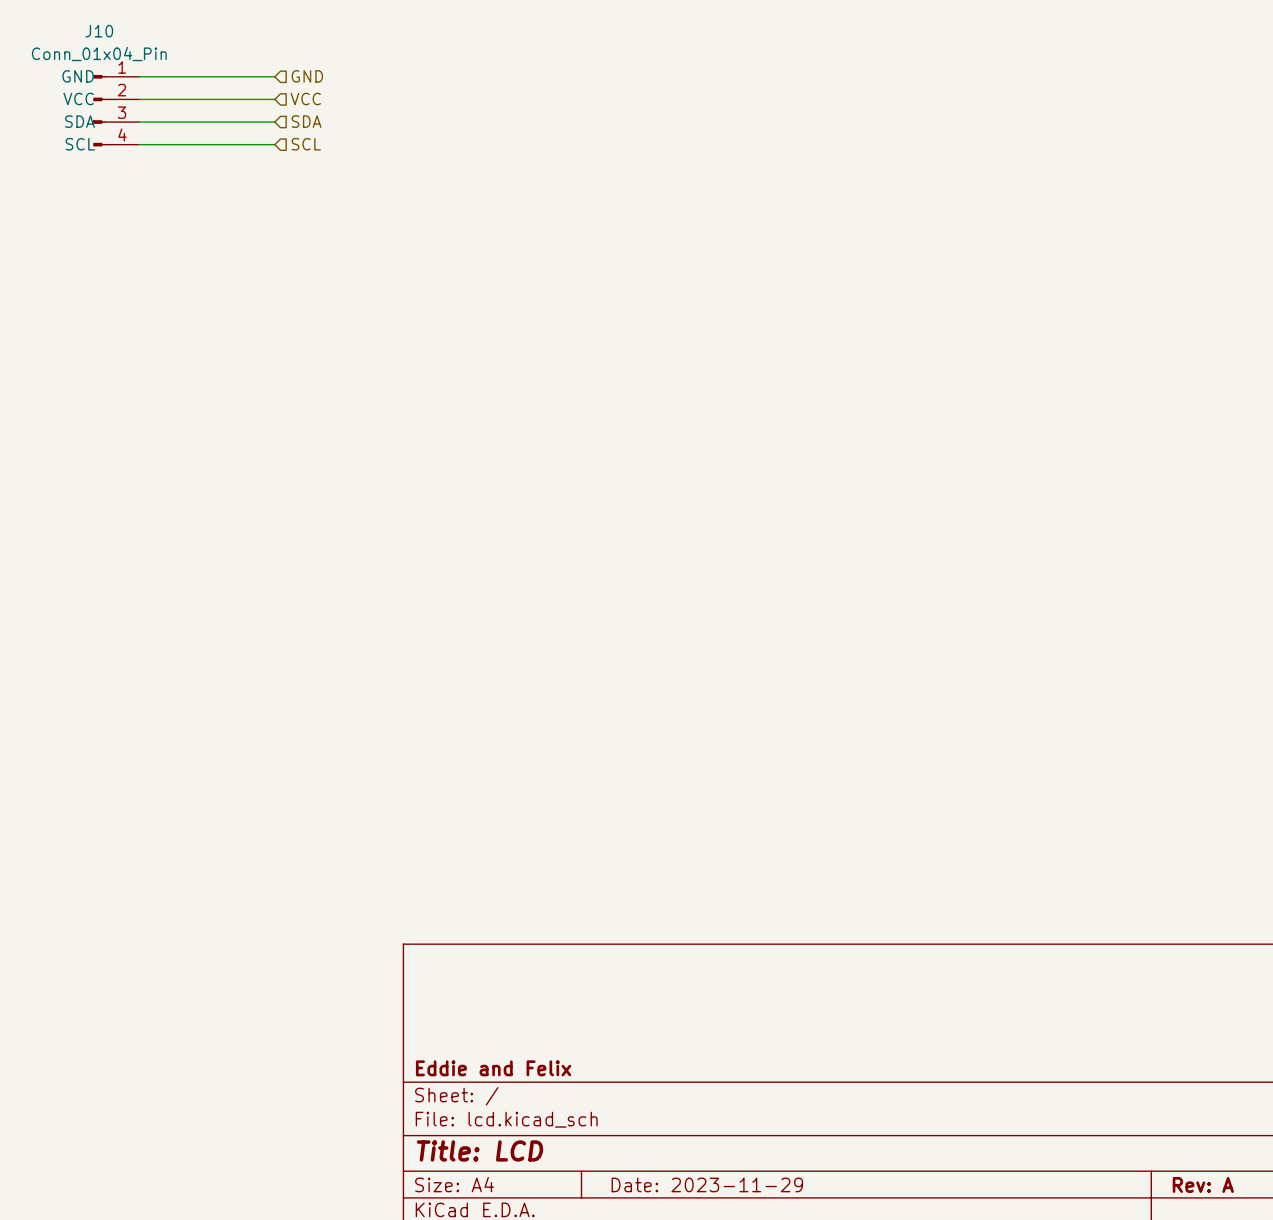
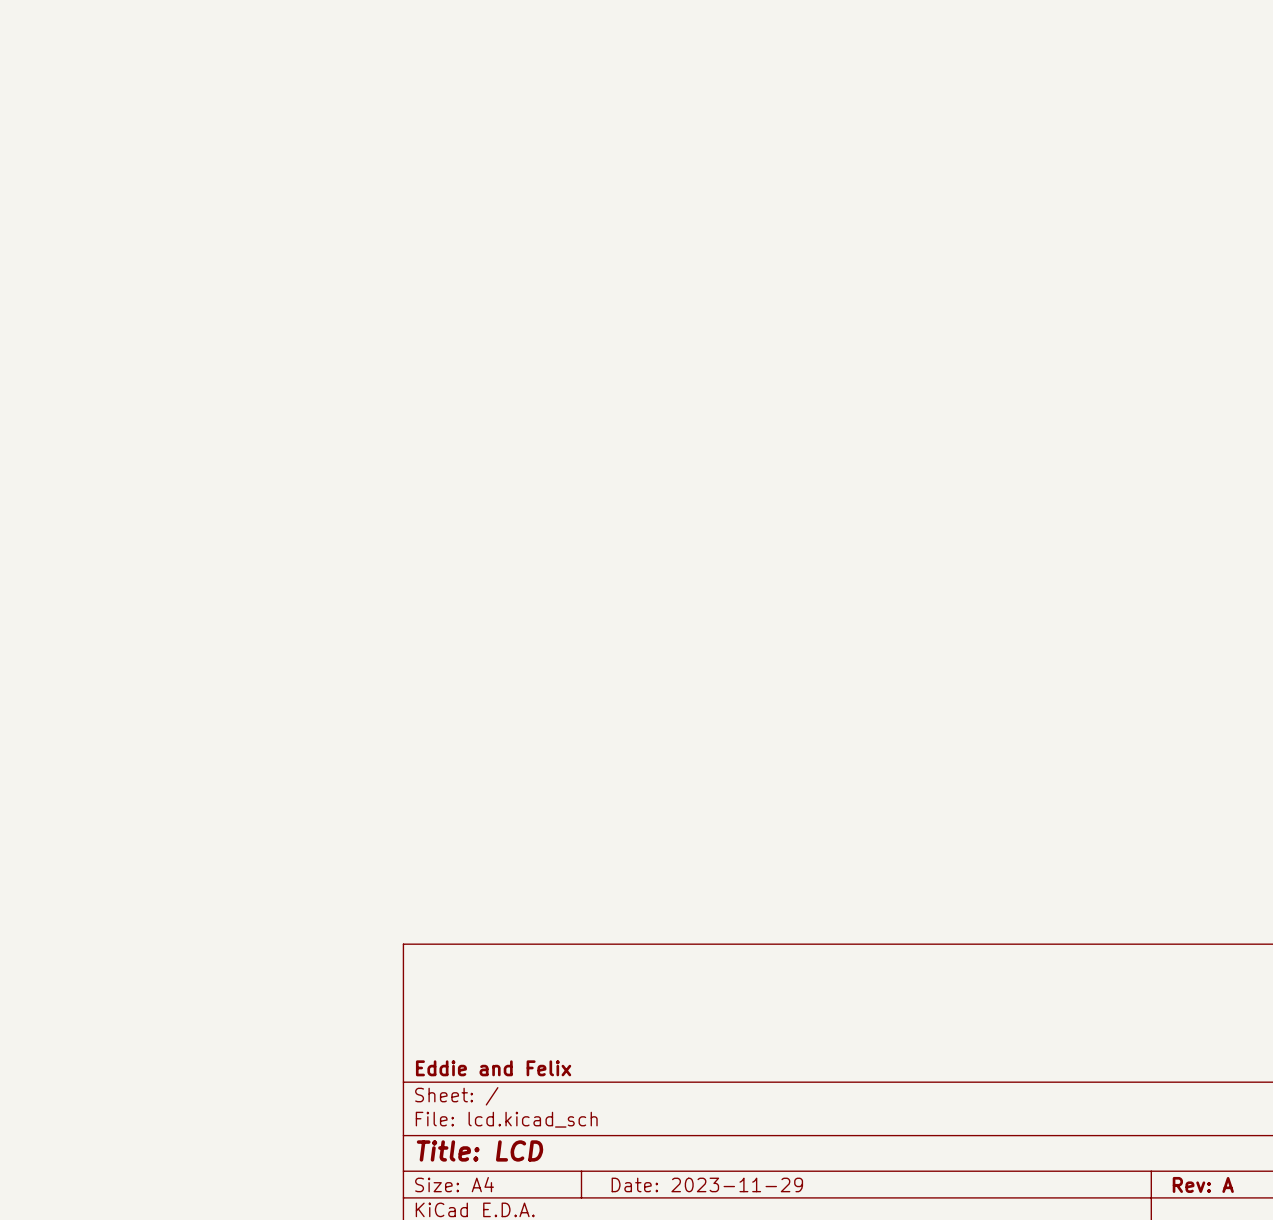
wire: (139, 76) (274, 76) -> none
hierarchical label: GND (307, 76) -> none
wire: (139, 99) (274, 99) -> none
hierarchical label: VCC (305, 99) -> none
J10: Conn_01x04_Pin (116, 110) -> none
hierarchical label: SDA (306, 121) -> none
wire: (139, 122) (274, 122) -> none
wire: (139, 144) (274, 144) -> none
hierarchical label: SCL (306, 144) -> none

